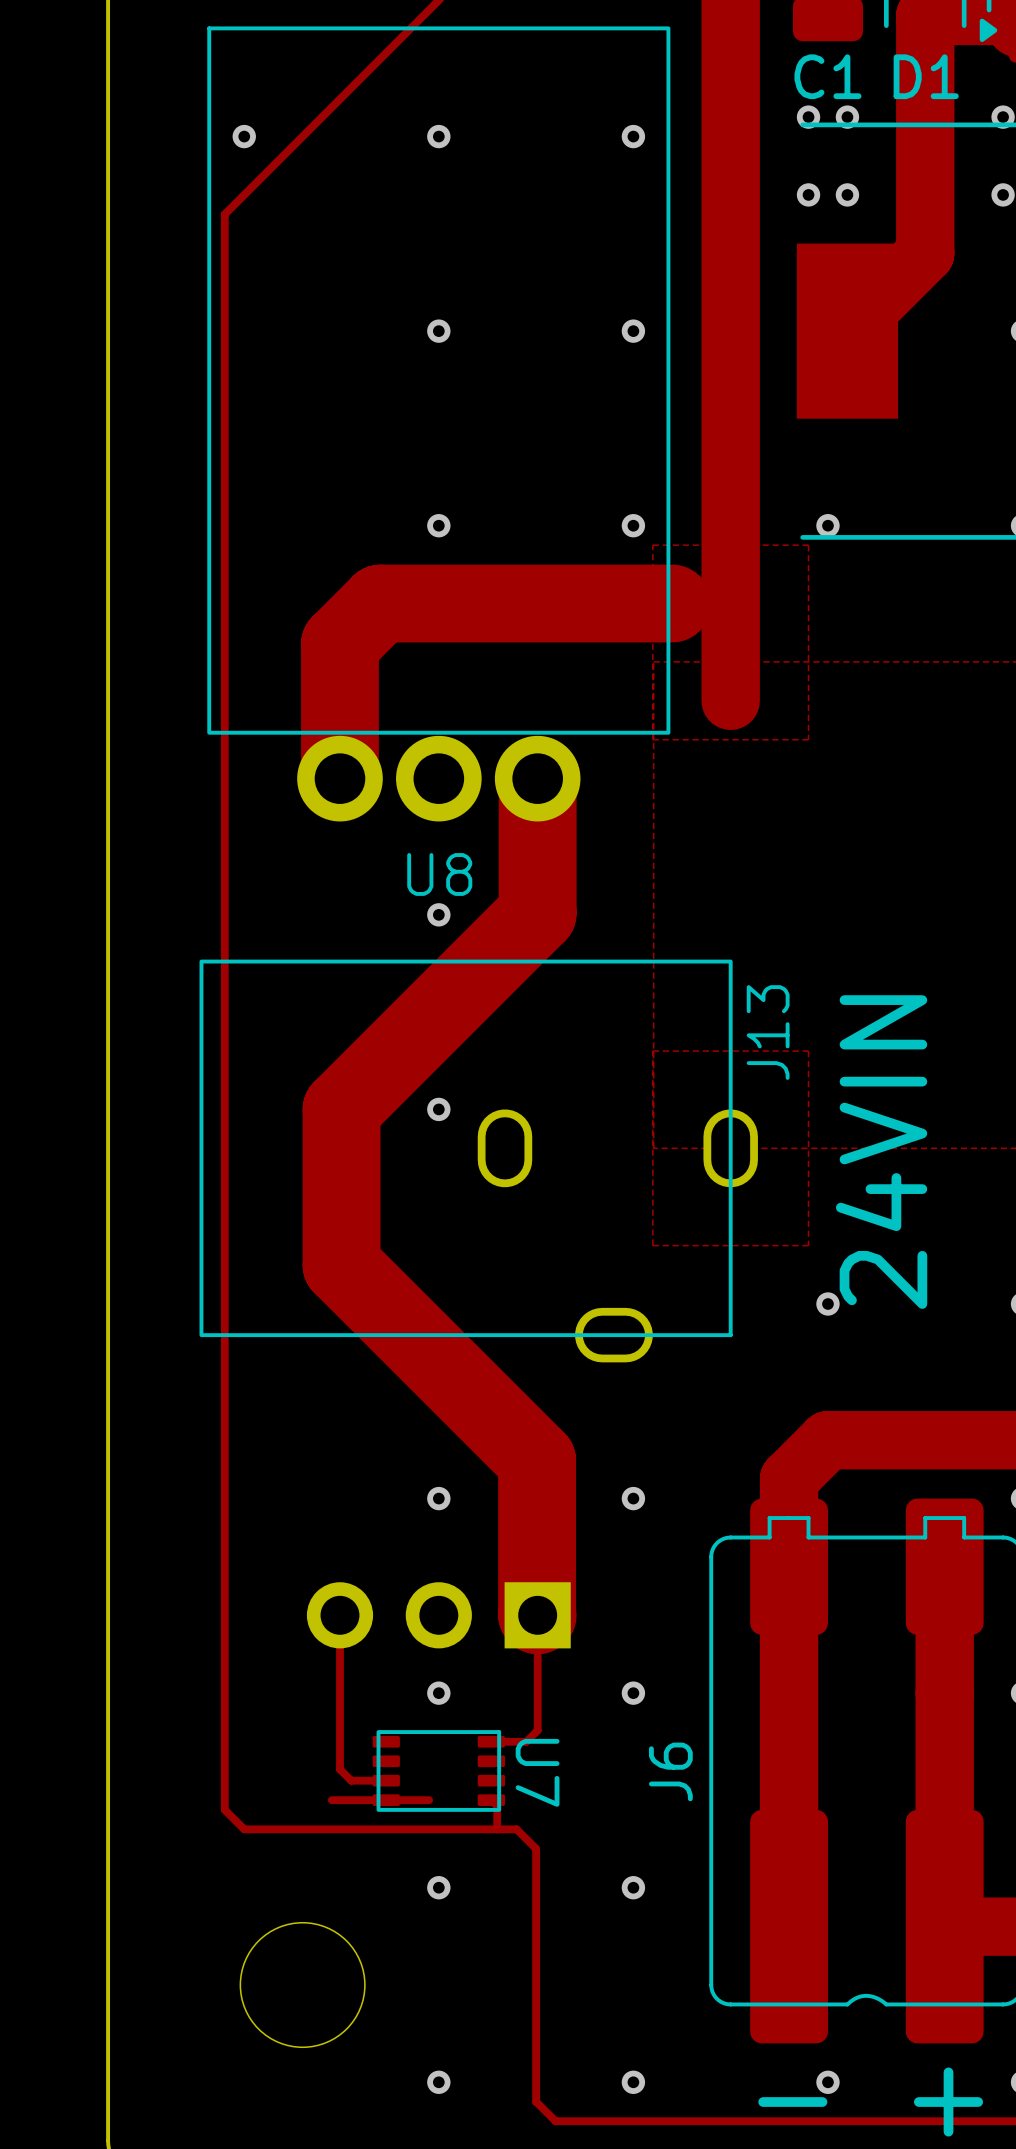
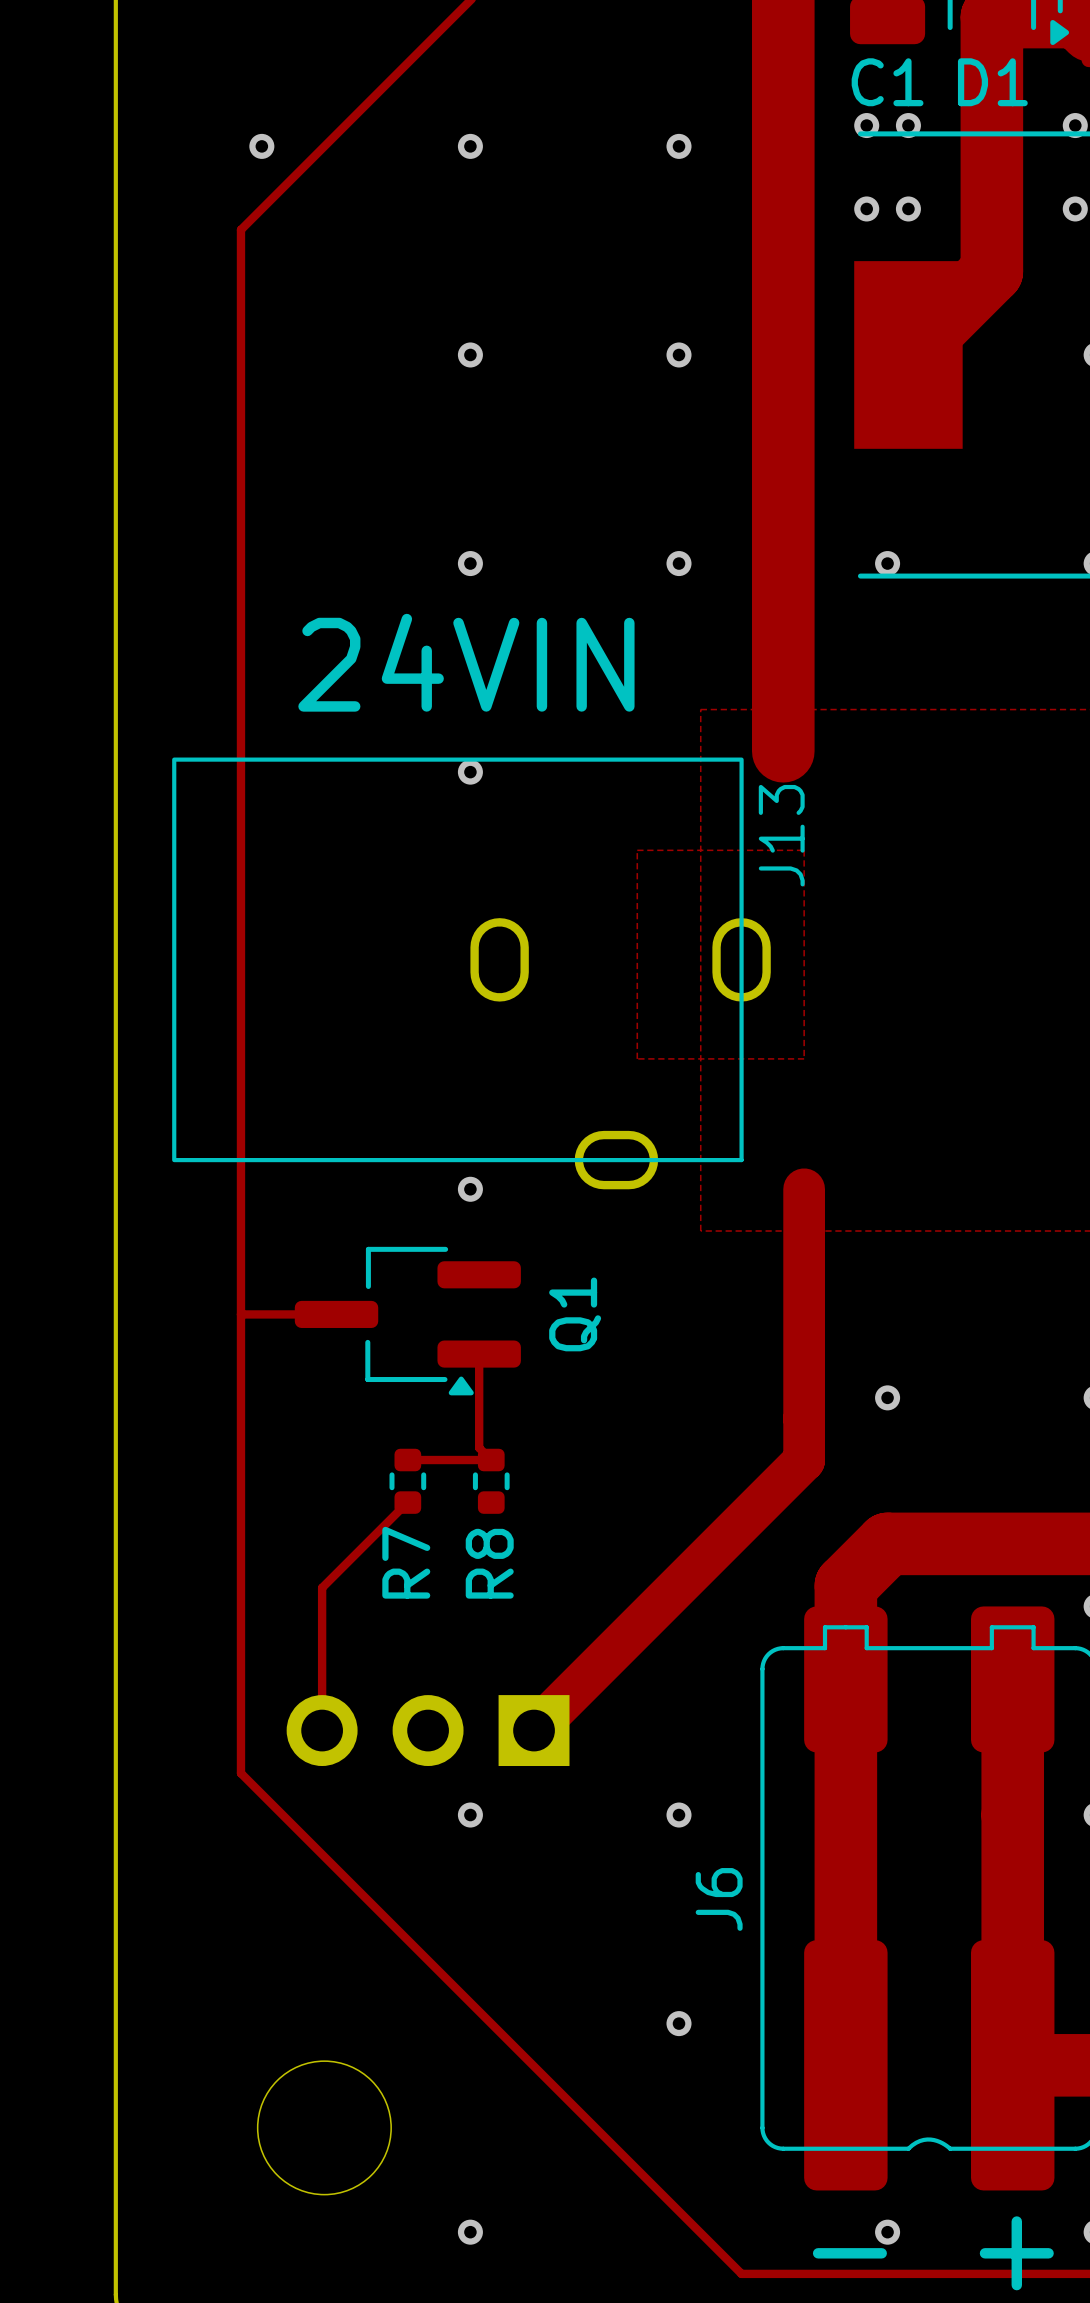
U8: (438, 423) -> none
top zone outline: (652, 545) (808, 545) (808, 739) (652, 739) (652, 545) -> (637, 850) (804, 850) (804, 1058) (637, 1058) (637, 850)
top track: (672, 603) (380, 603) (339, 644) (339, 778) -> none
top track: (537, 778) (537, 913) (341, 1109) (341, 1265) (537, 1460) (537, 1730) (526, 1741) (491, 1741) -> none
via position: (438, 914) -> (470, 772)
top zone outline: (652, 1051) (652, 1245) (808, 1245) (808, 1051) (652, 1051) -> none
top track: none -> (804, 1189) (804, 1460) (534, 1730)
text rotation: 0° (881, 1152) -> 90° clockwise (466, 662)
text position: 24VIN (881, 1152) -> 24VIN (466, 662)
J13 position: (478, 1160) -> (471, 973)
top track: none -> (240, 1314) (336, 1314)
Q1: none -> (407, 1321)
top track: none -> (479, 1354) (479, 1447) (491, 1460) (407, 1460)
R7: none -> (407, 1481)
R8: none -> (491, 1481)
top track: none -> (407, 1502) (322, 1587) (322, 1730)
via: (438, 1498) -> none
via: (633, 1498) -> none
top track: (339, 1615) (339, 1769) -> (240, 1773) (364, 1896)
part position: (438, 1615) -> (428, 1730)
top track: (224, 1654) (224, 1809) (244, 1829) (516, 1829) (536, 1848) (536, 2101) (555, 2121) (691, 2121) -> (376, 1908) (741, 2273)
U7: (438, 1770) -> none
top track: (351, 1780) (386, 1780) -> none
top track: (331, 1800) (429, 1800) -> none
top track: (491, 1800) (497, 1806) (497, 1829) -> none
via: (438, 1887) -> none
via: (633, 2082) -> none

